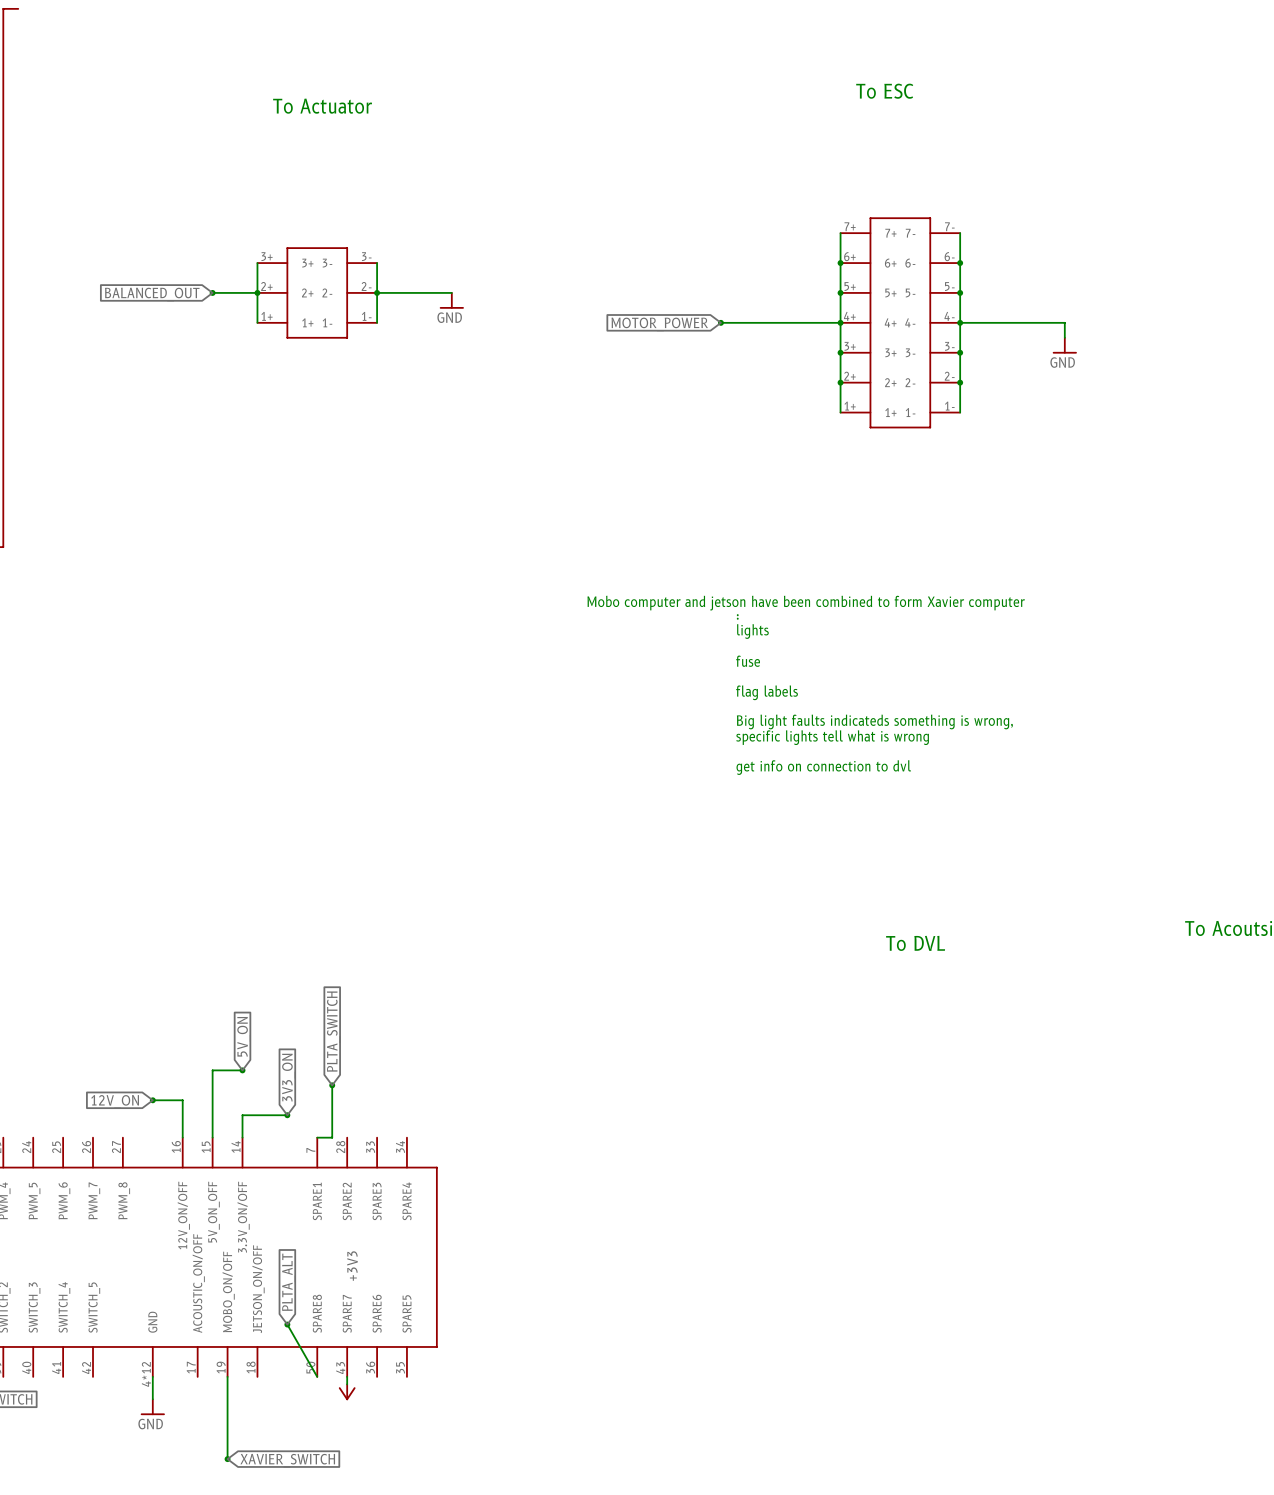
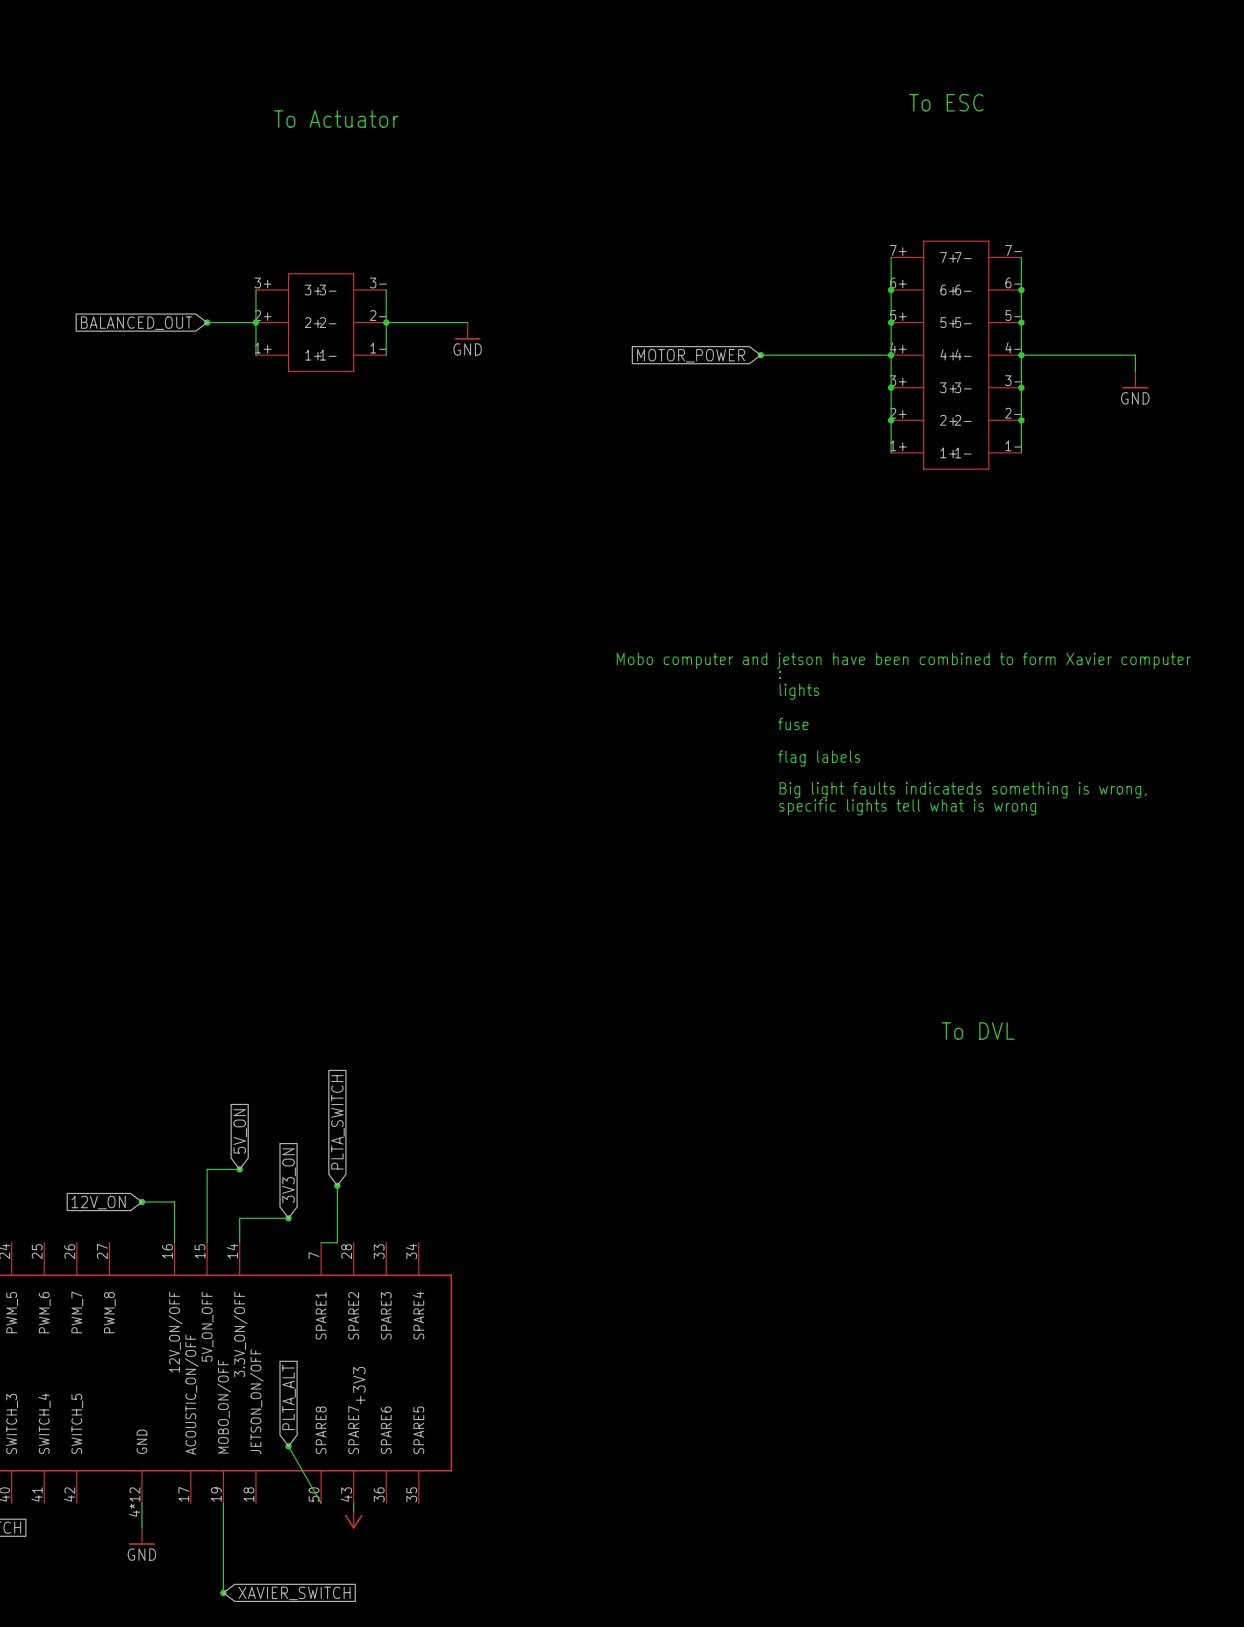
text: get info on connection to dvl (823, 767) -> none

